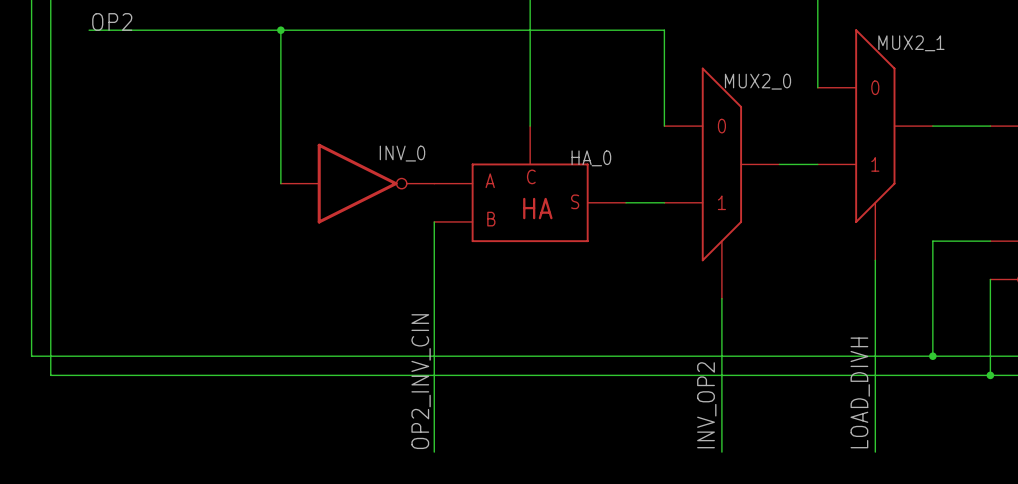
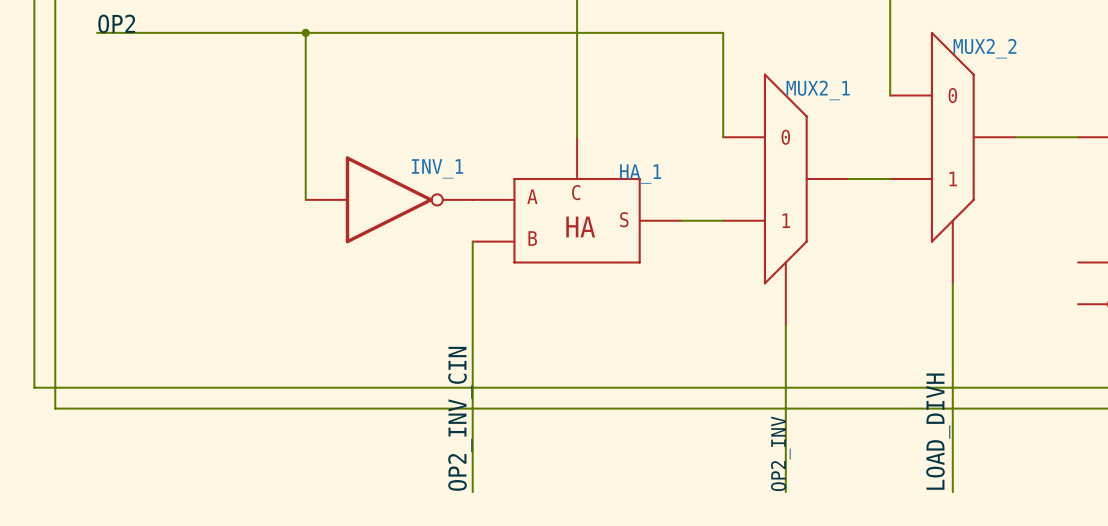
MUX2_1 name: MUX2_1 (911, 43) -> MUX2_2 (984, 48)
MUX2_0 name: MUX2_0 (758, 81) -> MUX2_1 (818, 90)
INV_0 name: INV_0 (402, 153) -> INV_1 (437, 168)
HA_0 name: HA_0 (591, 158) -> HA_1 (640, 174)
wire: (990, 241) (932, 241) (932, 356) -> none
wire: (990, 279) (990, 375) -> none
junction: (932, 356) -> none
junction: (990, 375) -> none
label: INV_OP2 (706, 405) -> OP2_INV (780, 453)

